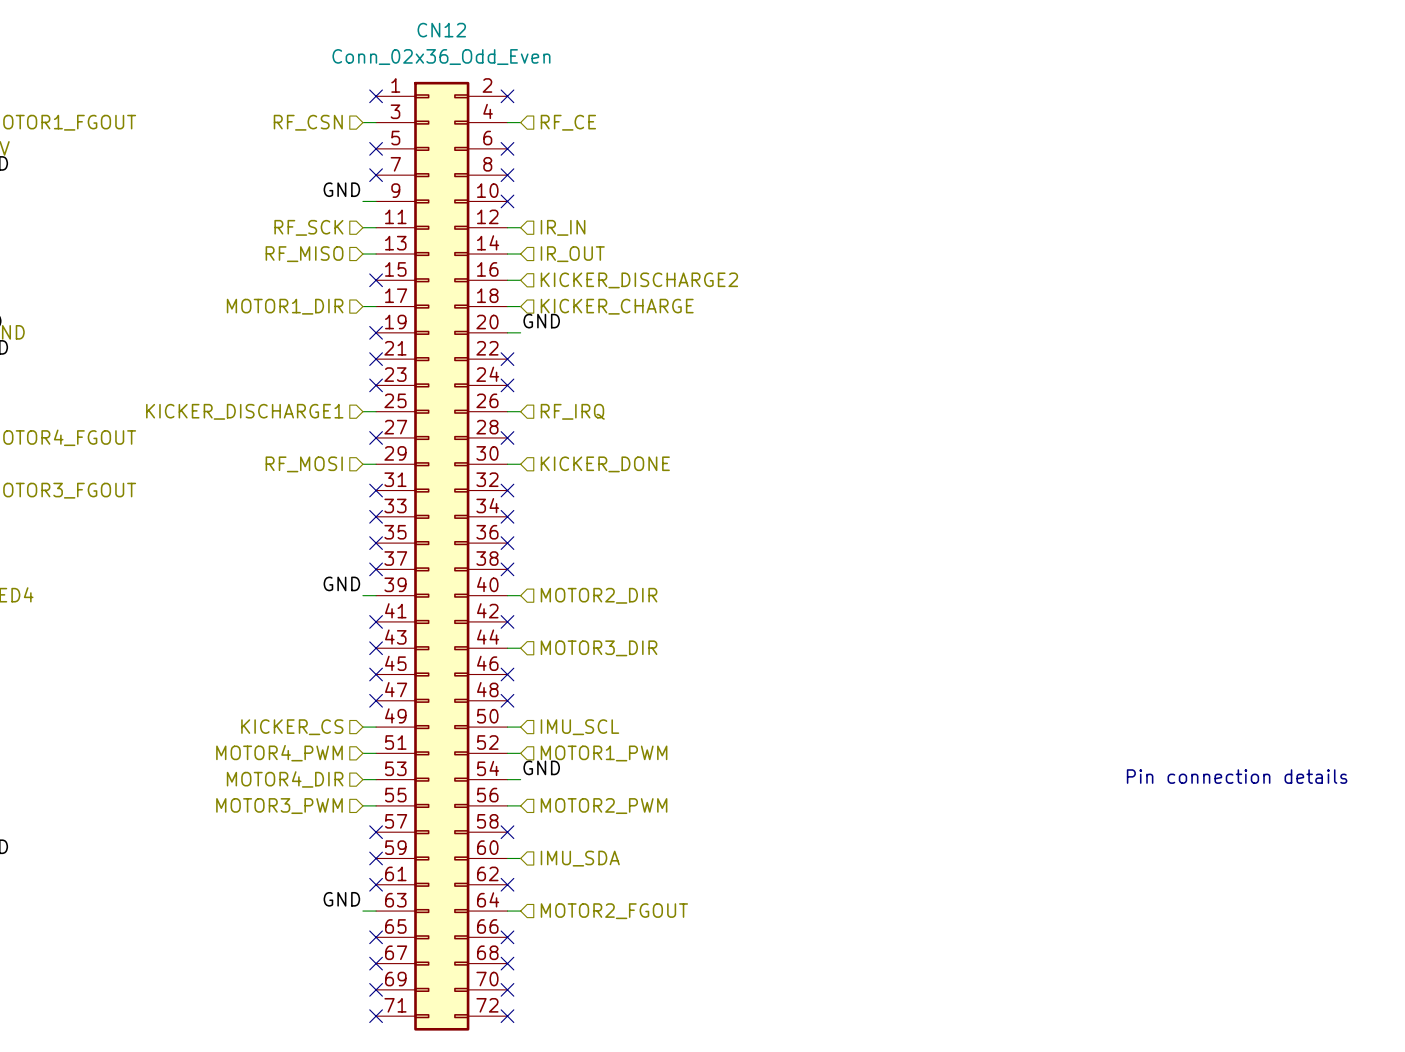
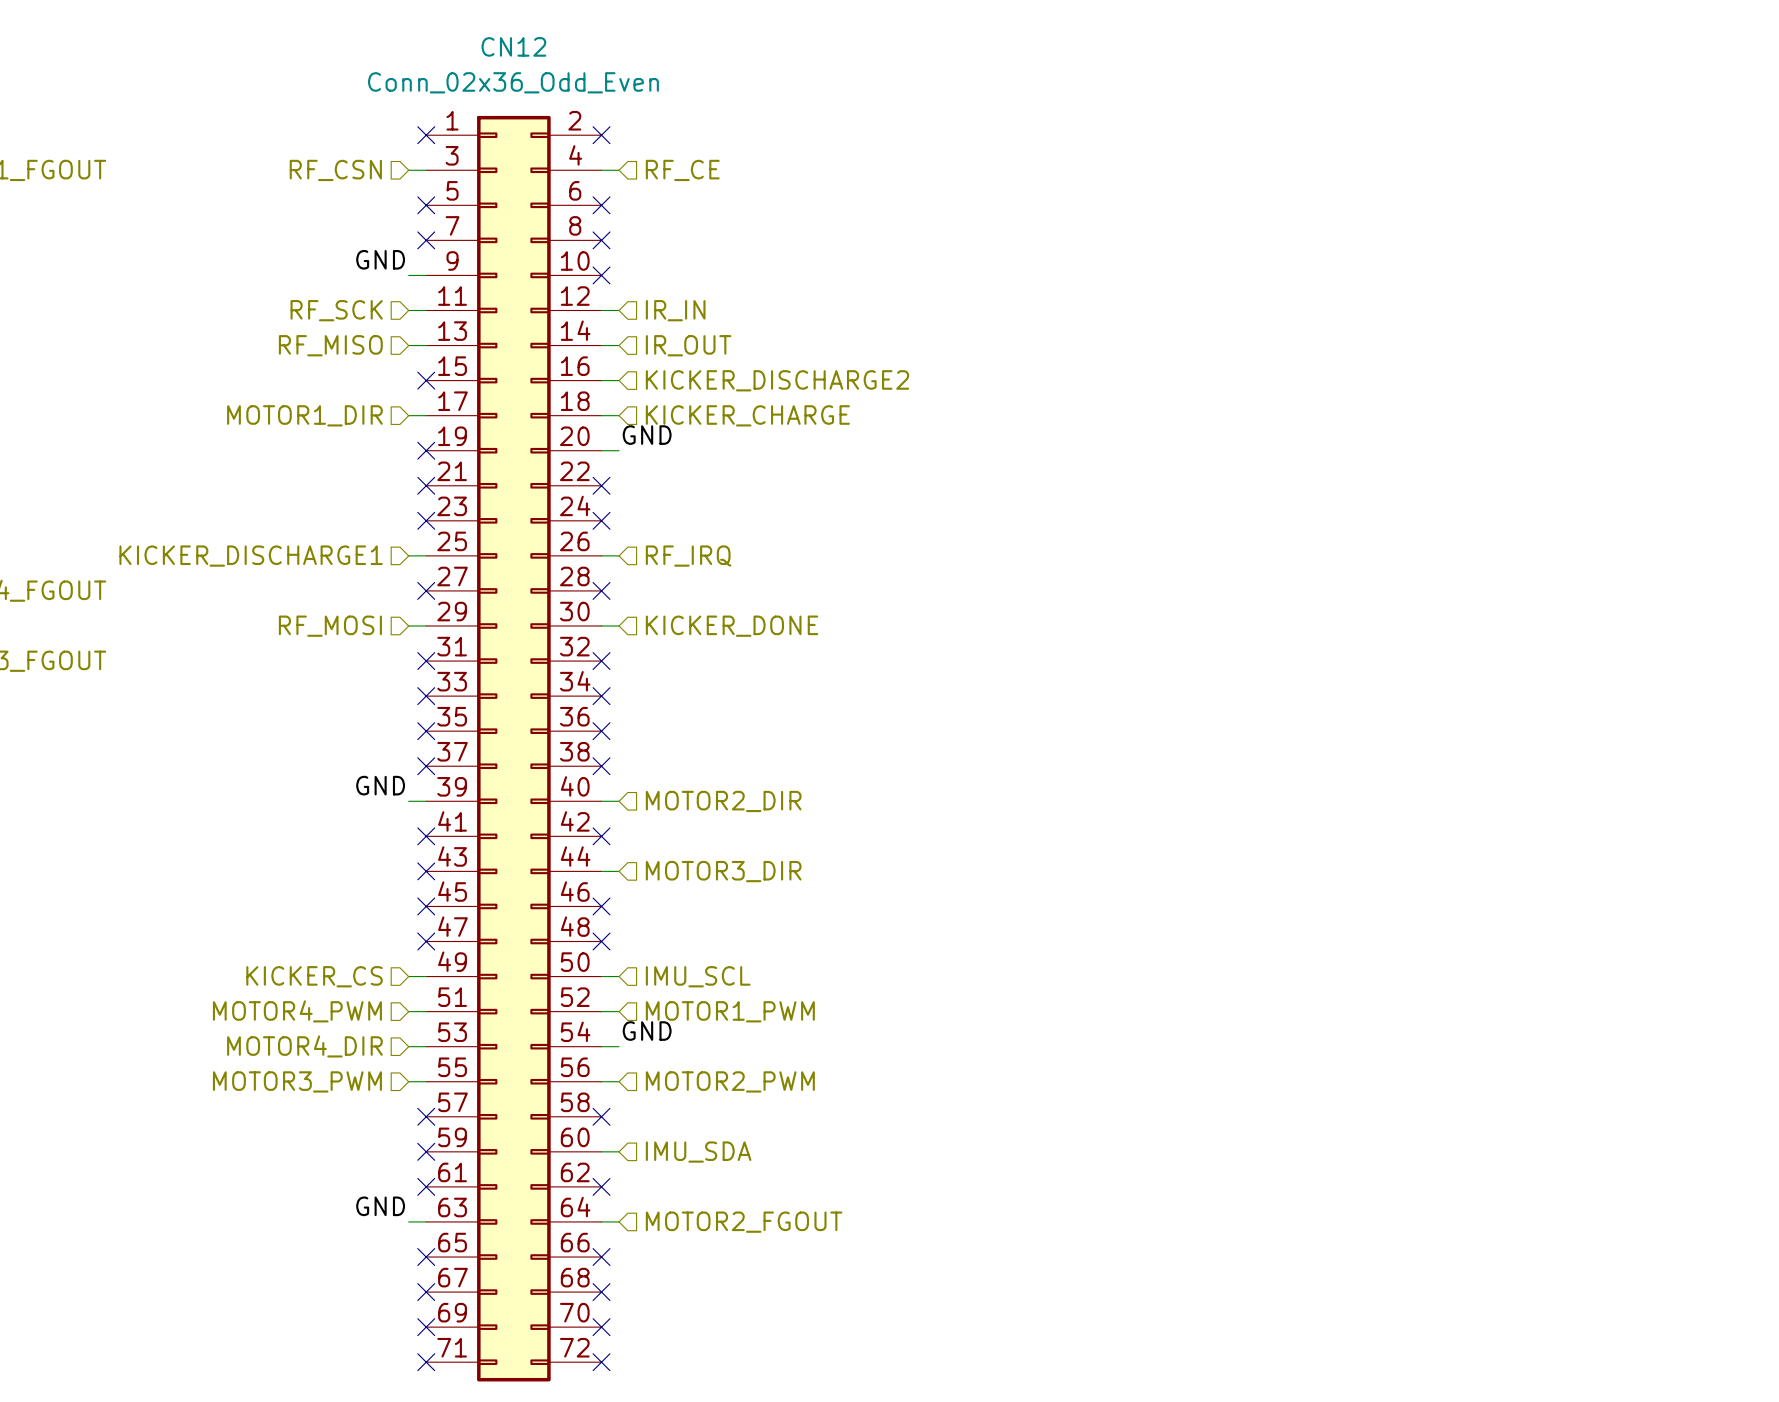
text: Pin connection details (1237, 776) -> none

